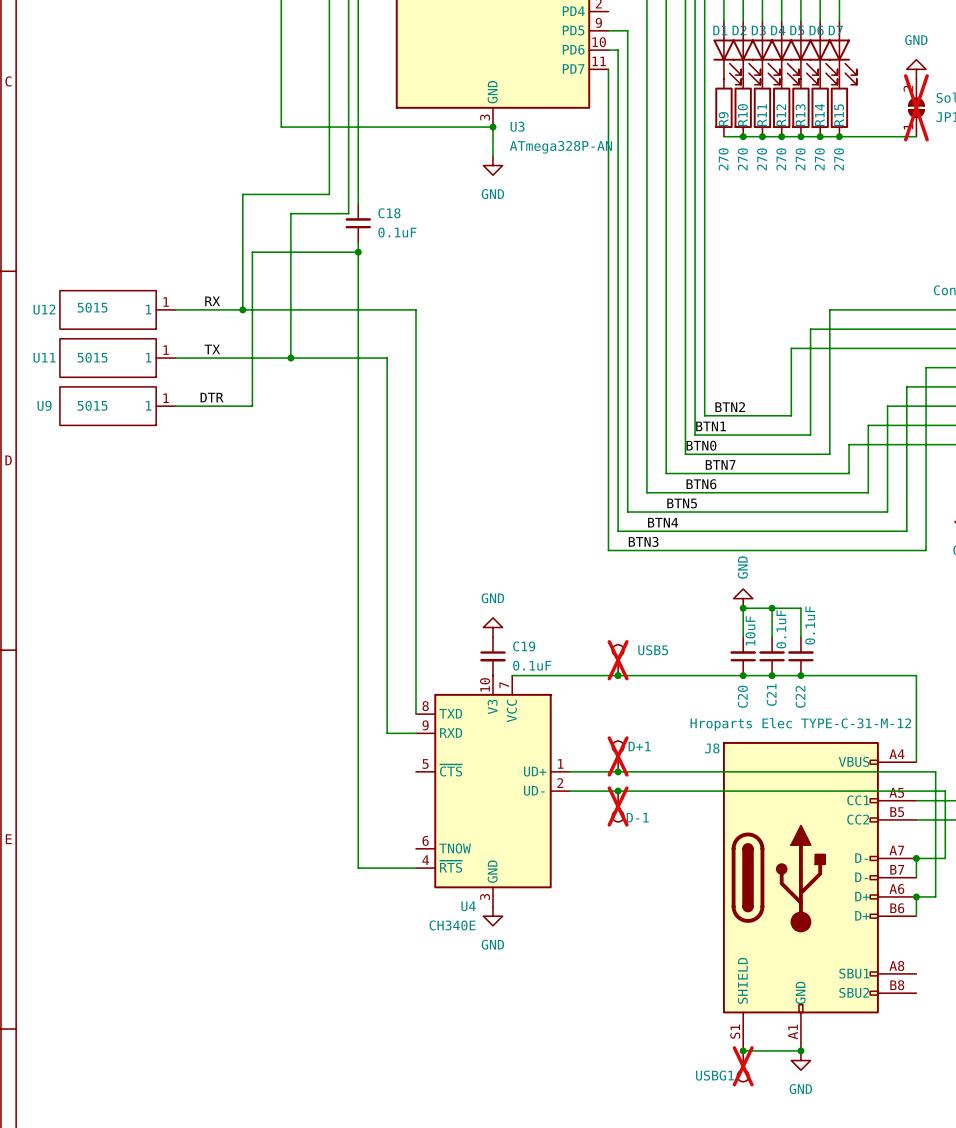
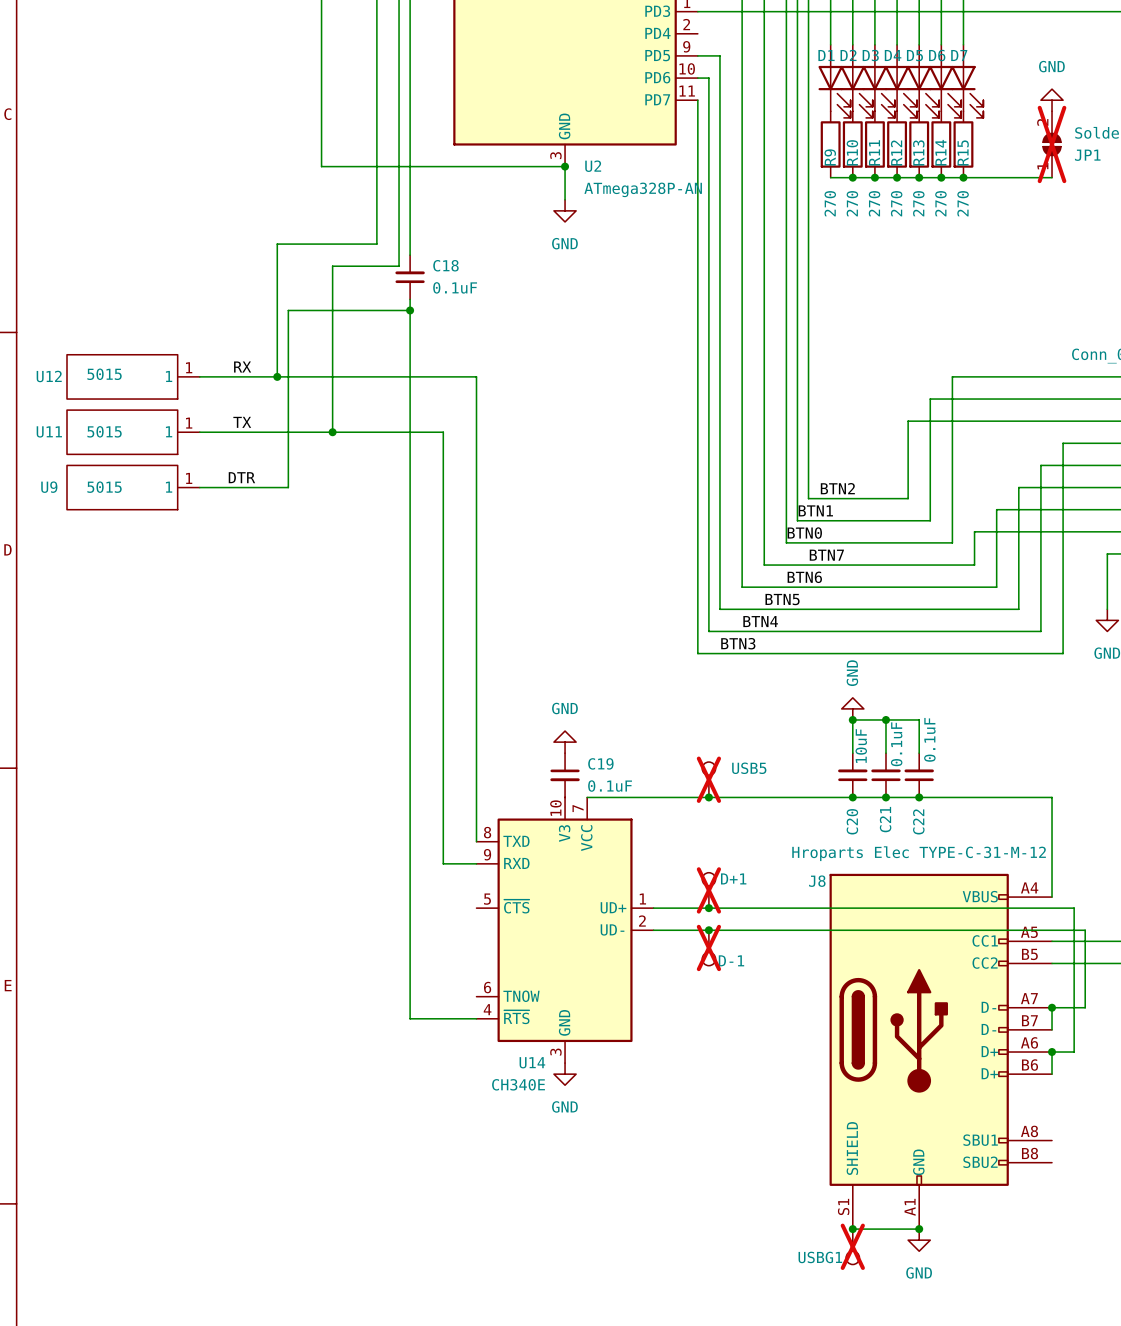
U3 name: U3 (517, 126) -> U2 (593, 166)
U4 name: U4 (468, 906) -> U14 (532, 1062)

